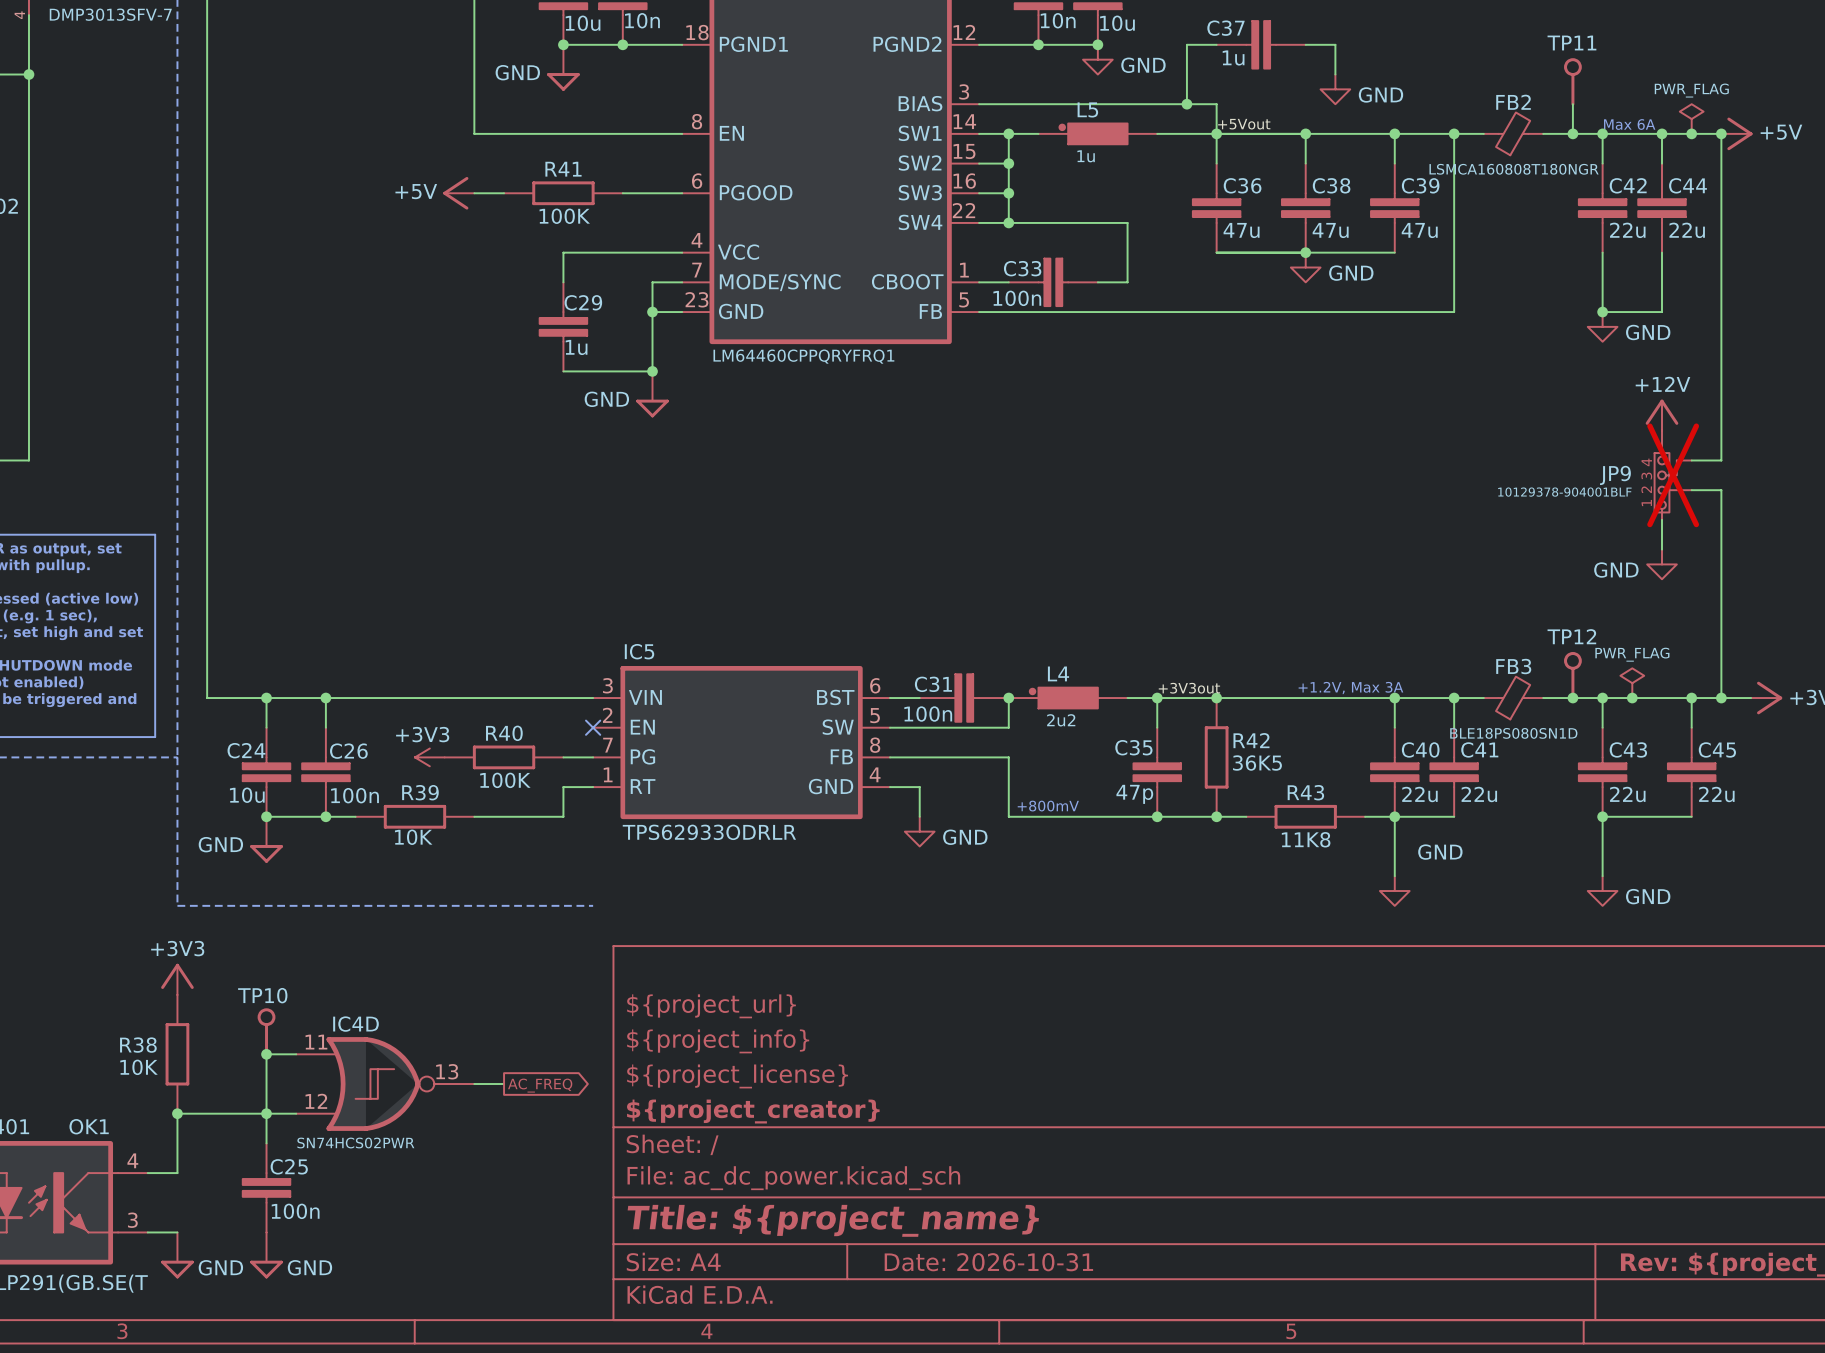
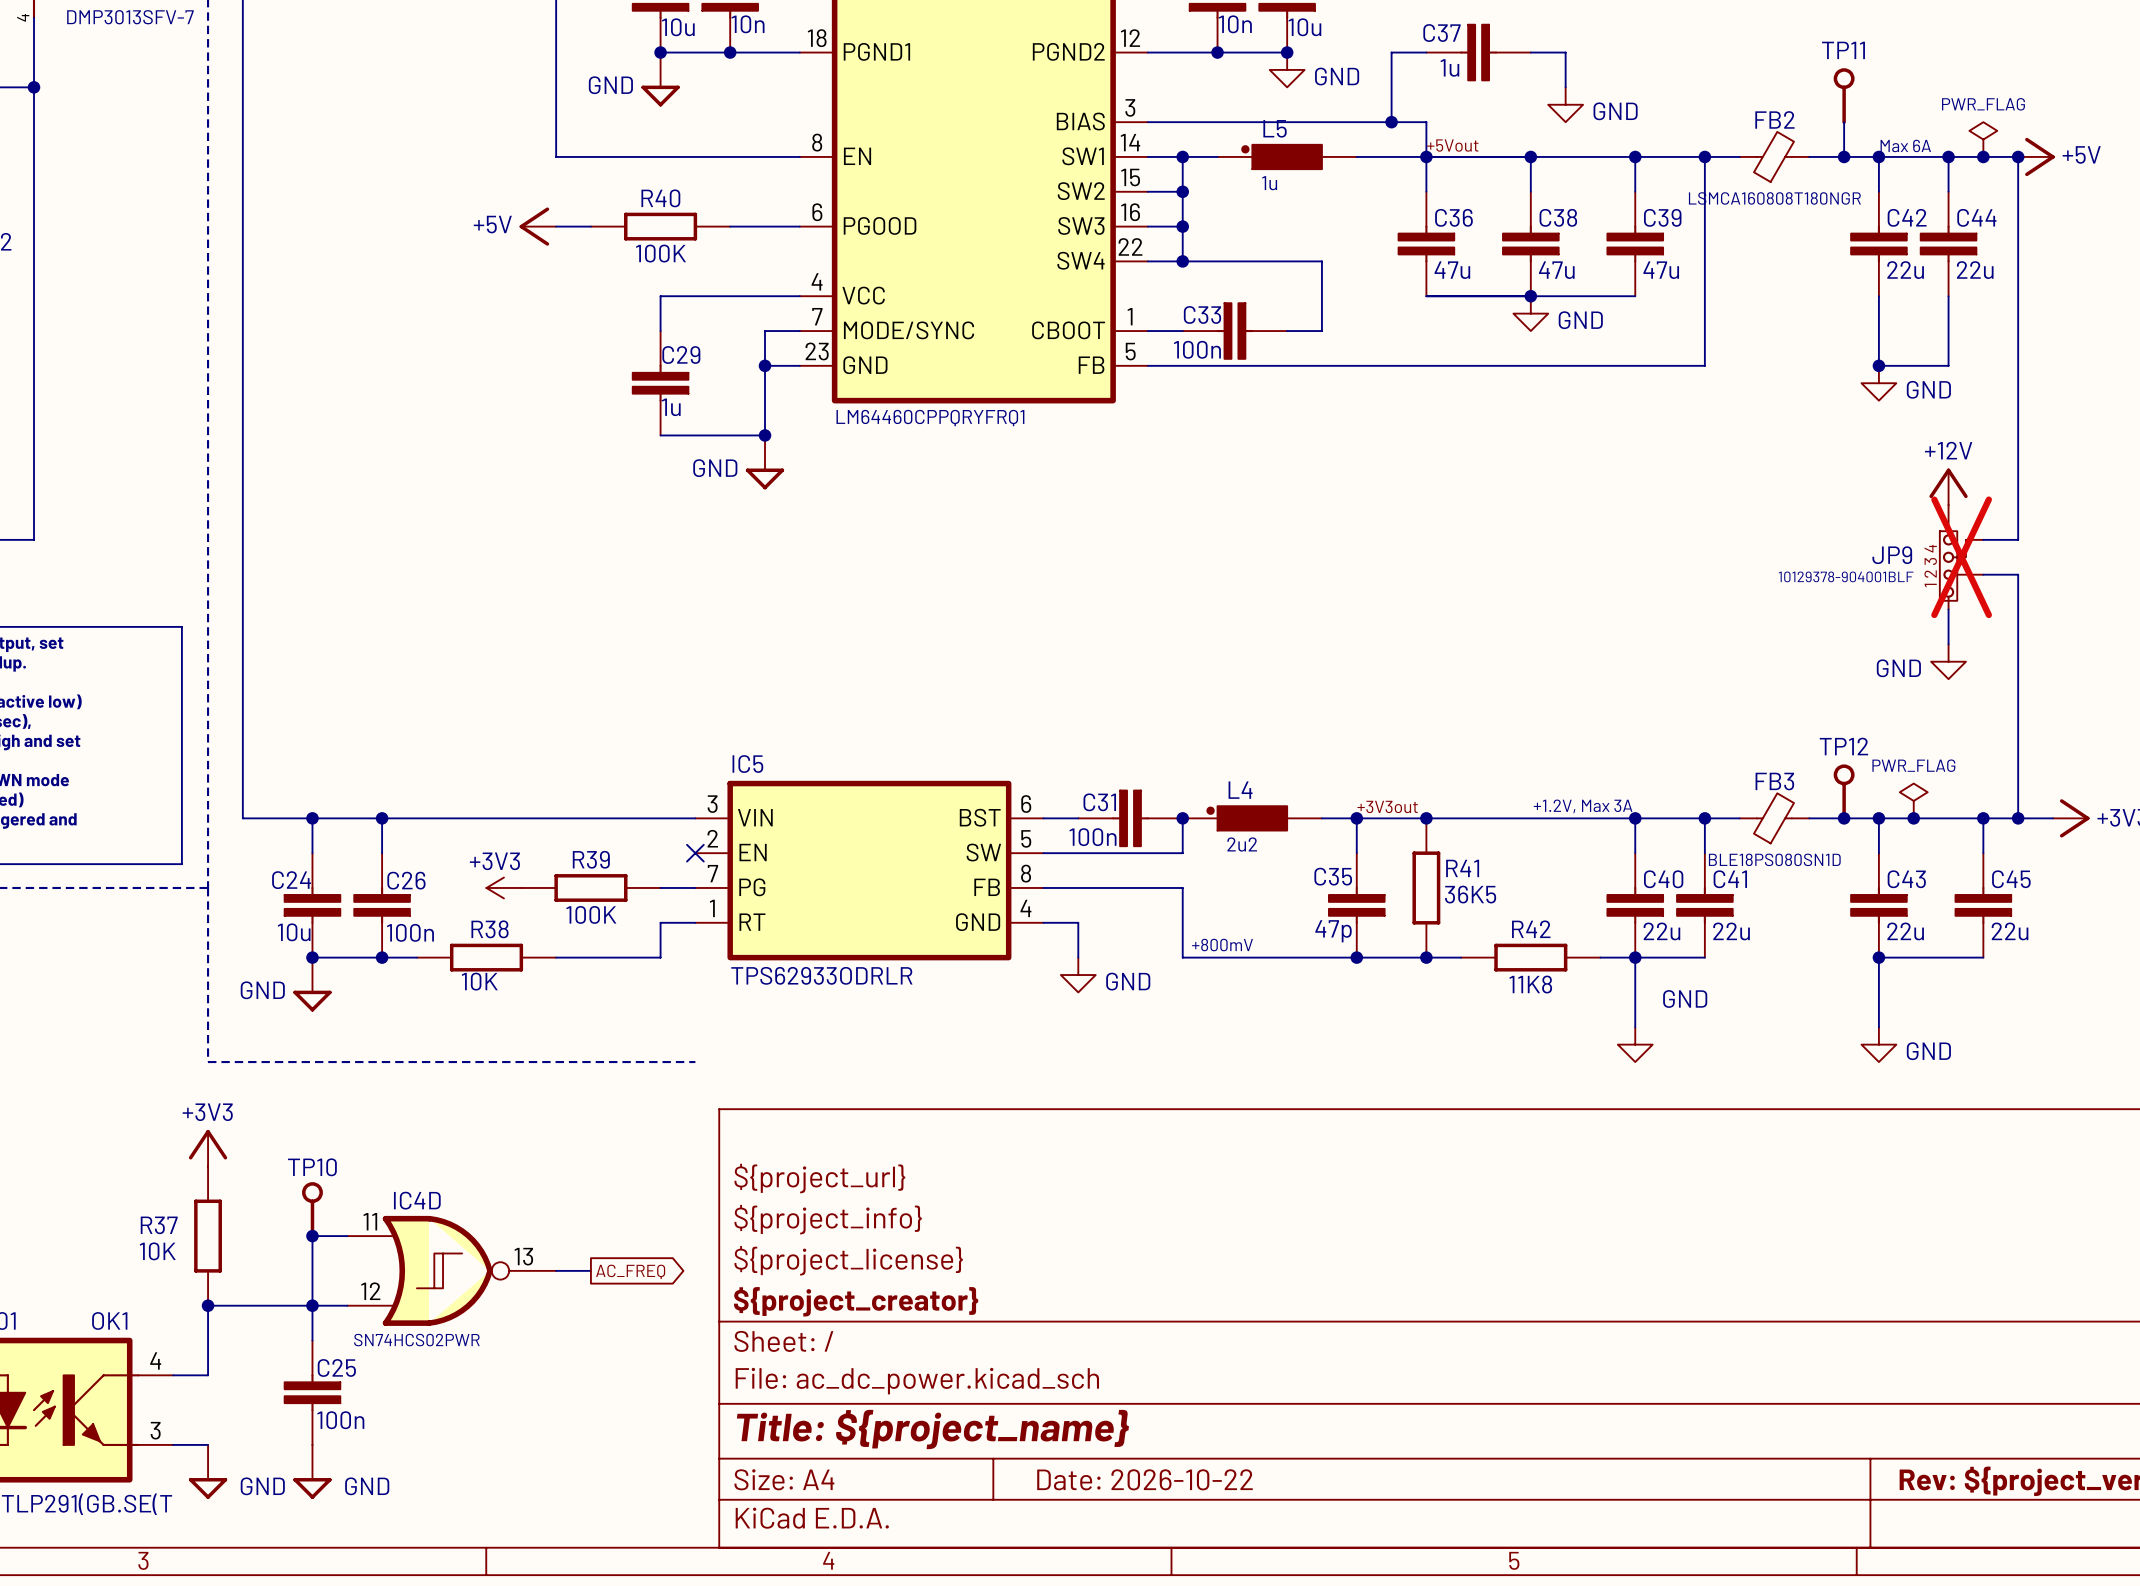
R41 name: R41 (563, 169) -> R40 (660, 198)
R40 name: R40 (504, 733) -> R39 (591, 859)
R42 name: R42 (1251, 740) -> R41 (1462, 868)
R39 name: R39 (420, 792) -> R38 (490, 929)
R43 name: R43 (1305, 792) -> R42 (1531, 929)
R38 name: R38 (138, 1045) -> R37 (159, 1225)
title block: Date: 2026-10-31 (988, 1262) -> Date: 2026-10-22 (1144, 1479)

